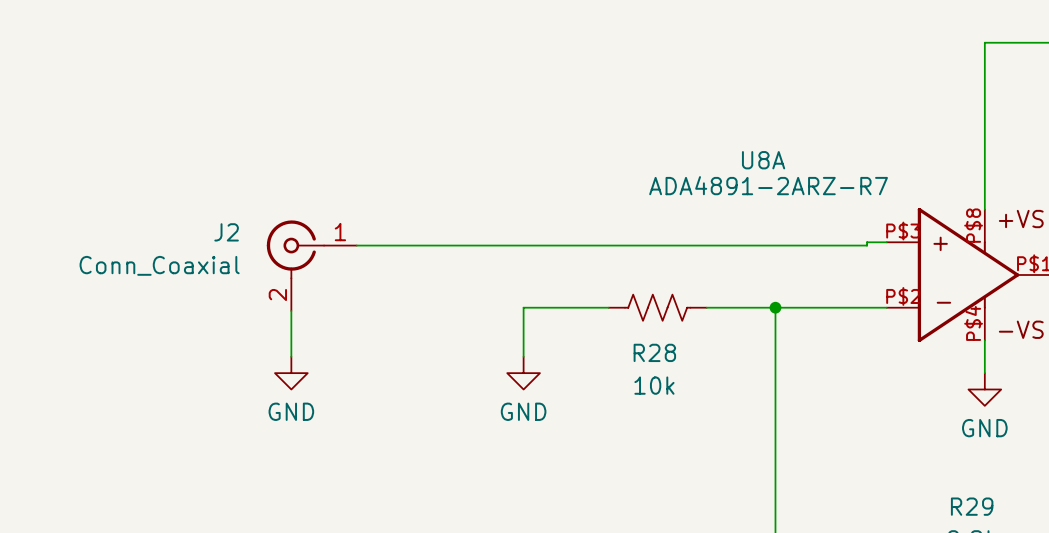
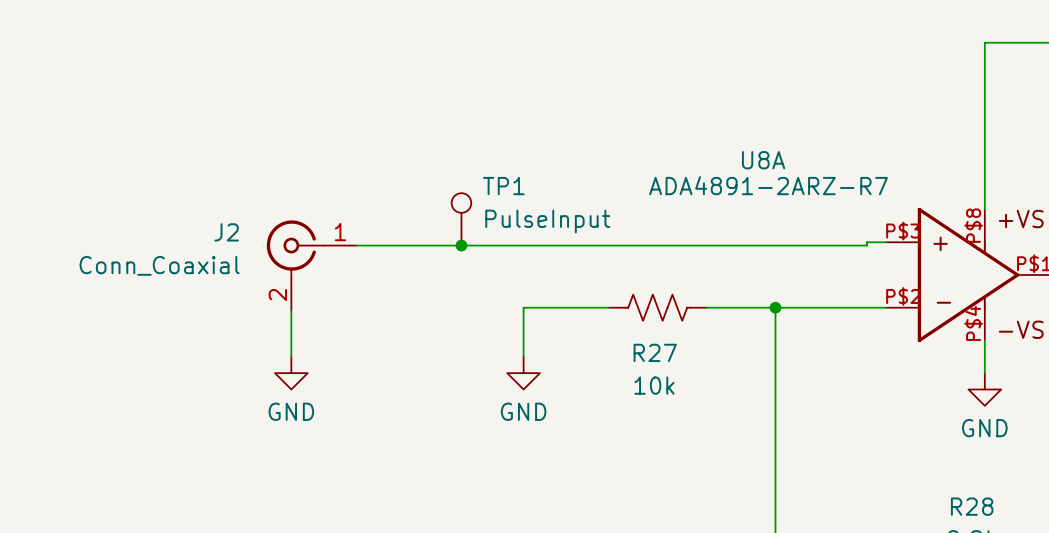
TP1: none -> PulseInput (461, 219)
junction: none -> (461, 245)
R28 name: R28 (654, 352) -> R27 (655, 352)
R29 name: R29 (972, 506) -> R28 (972, 506)

